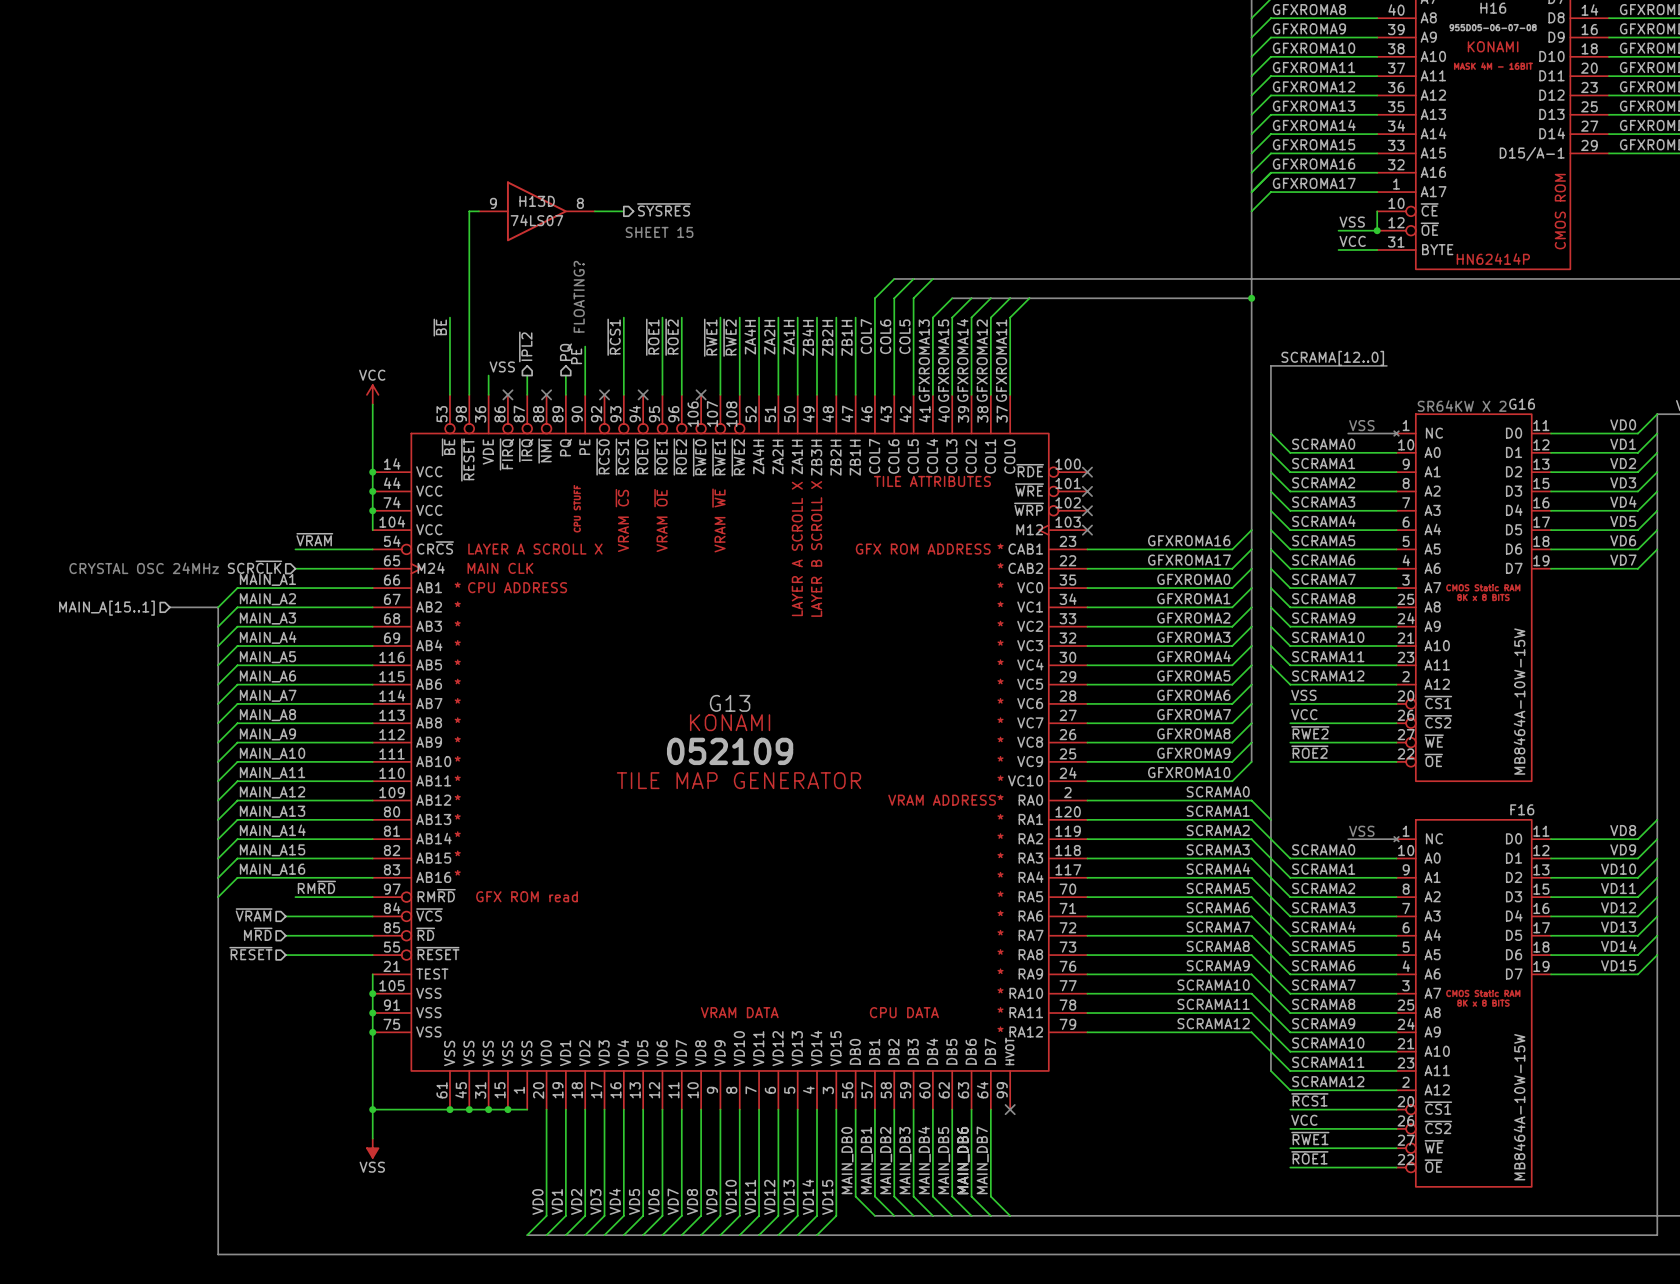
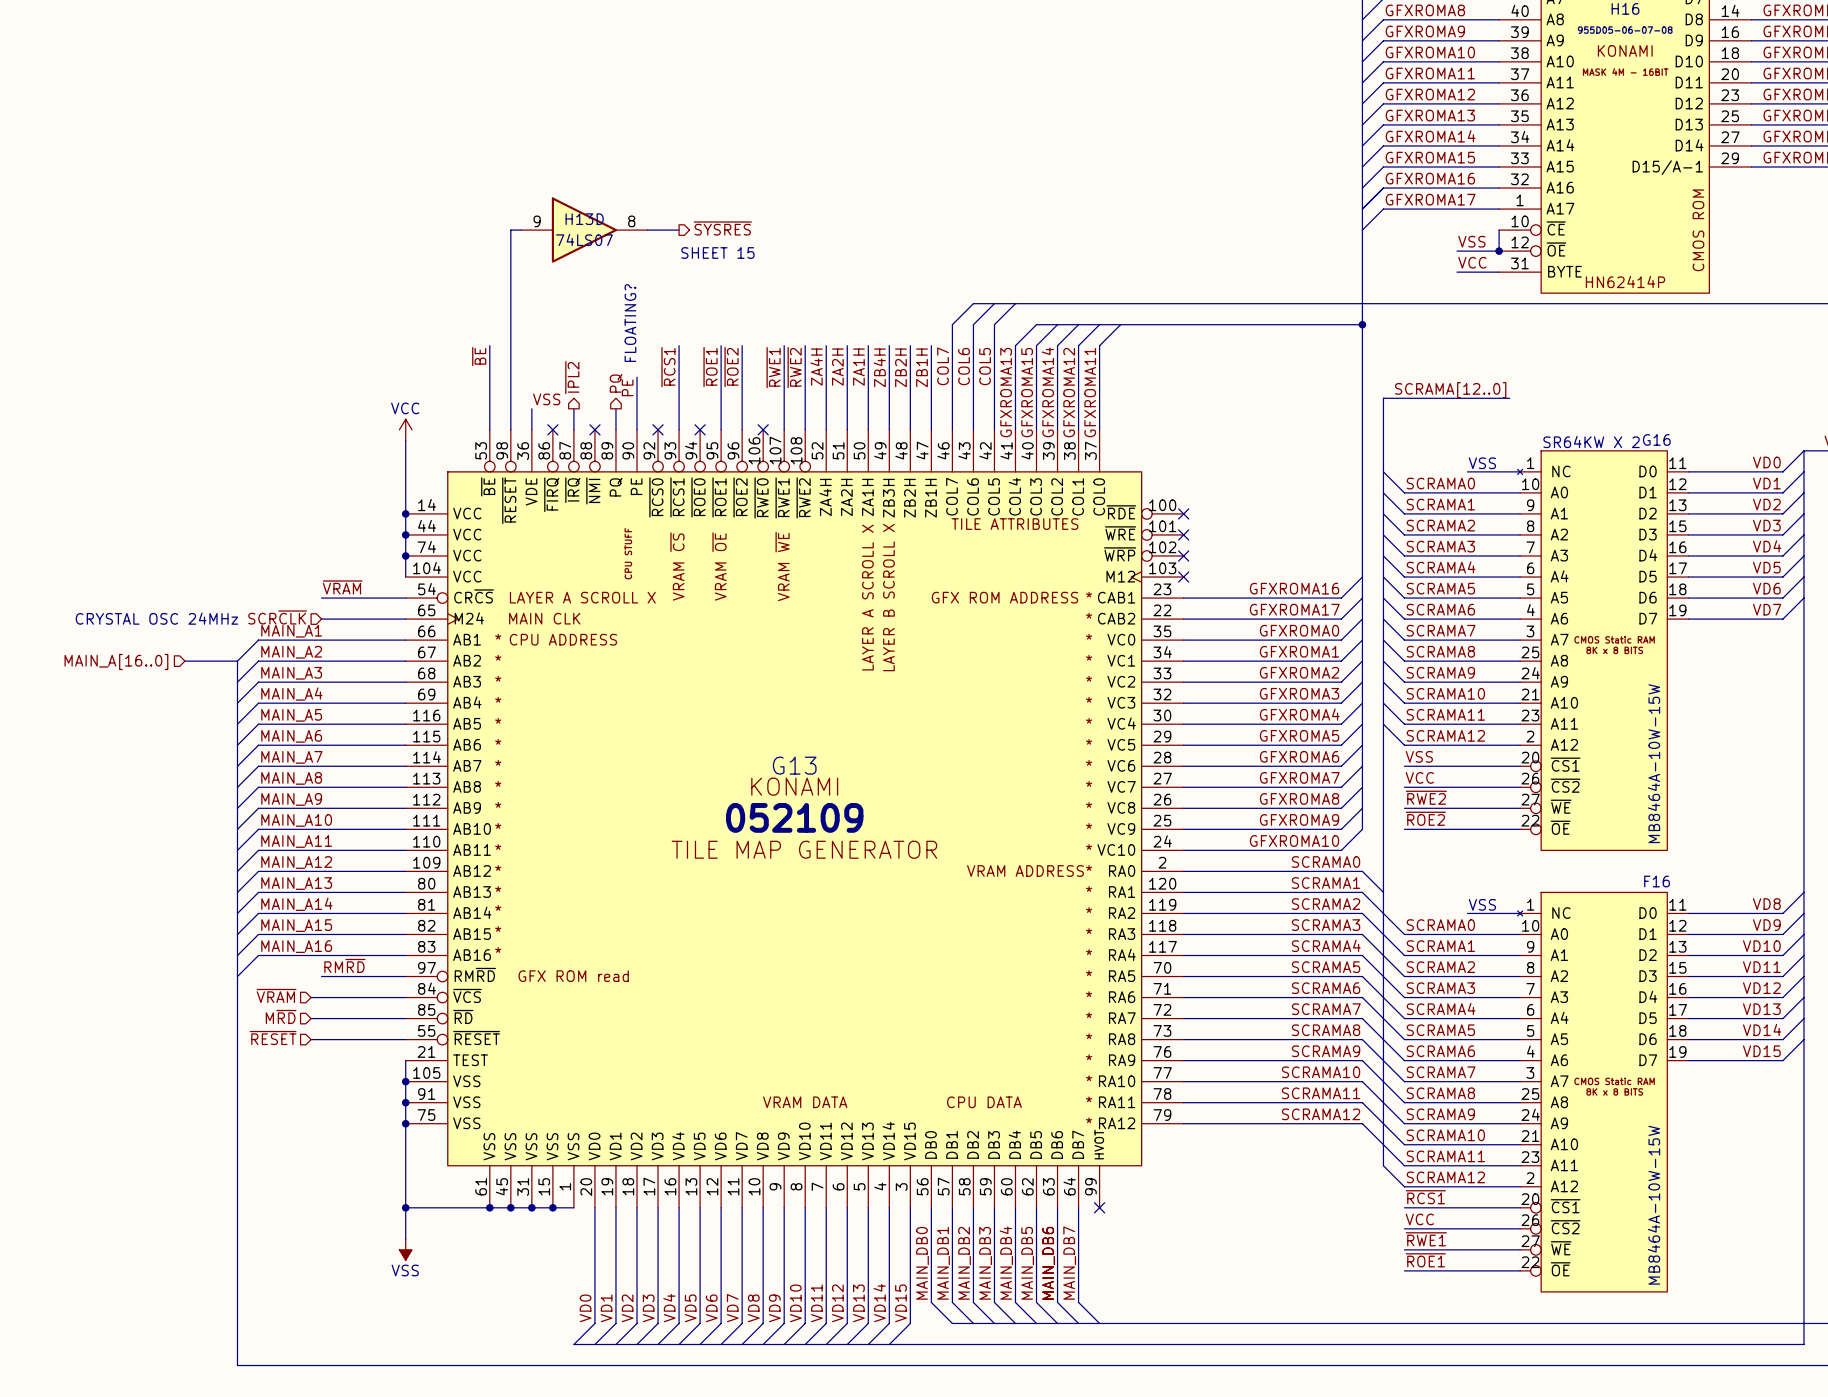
hierarchical label: MAIN_A[15..1] (106, 608) -> MAIN_A[16..0] (116, 661)

